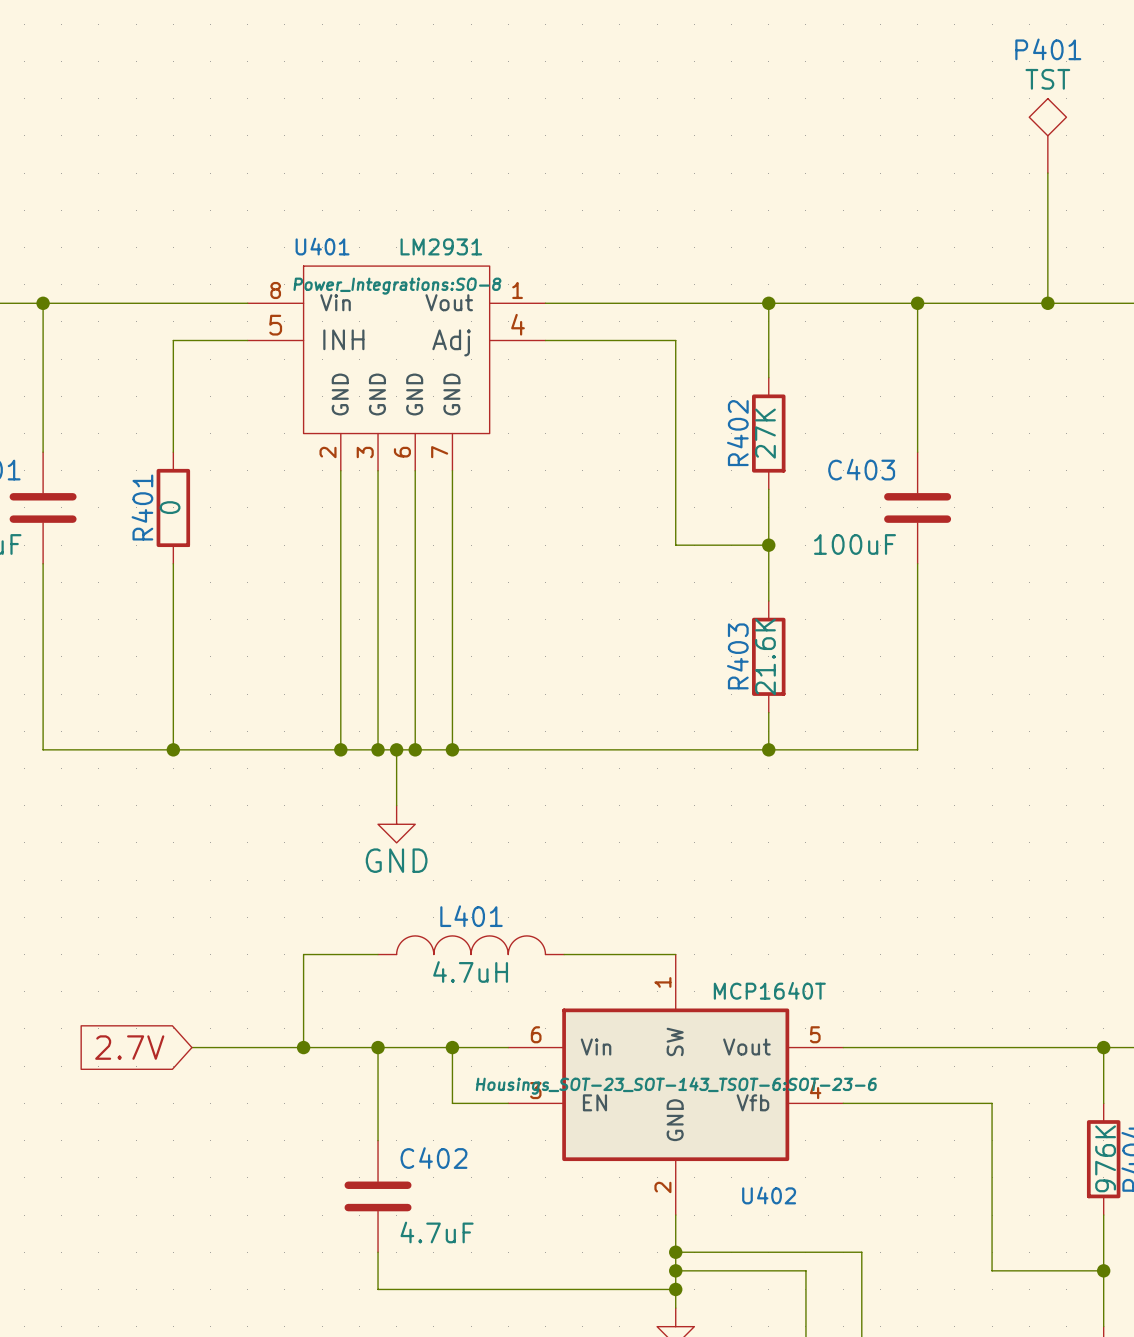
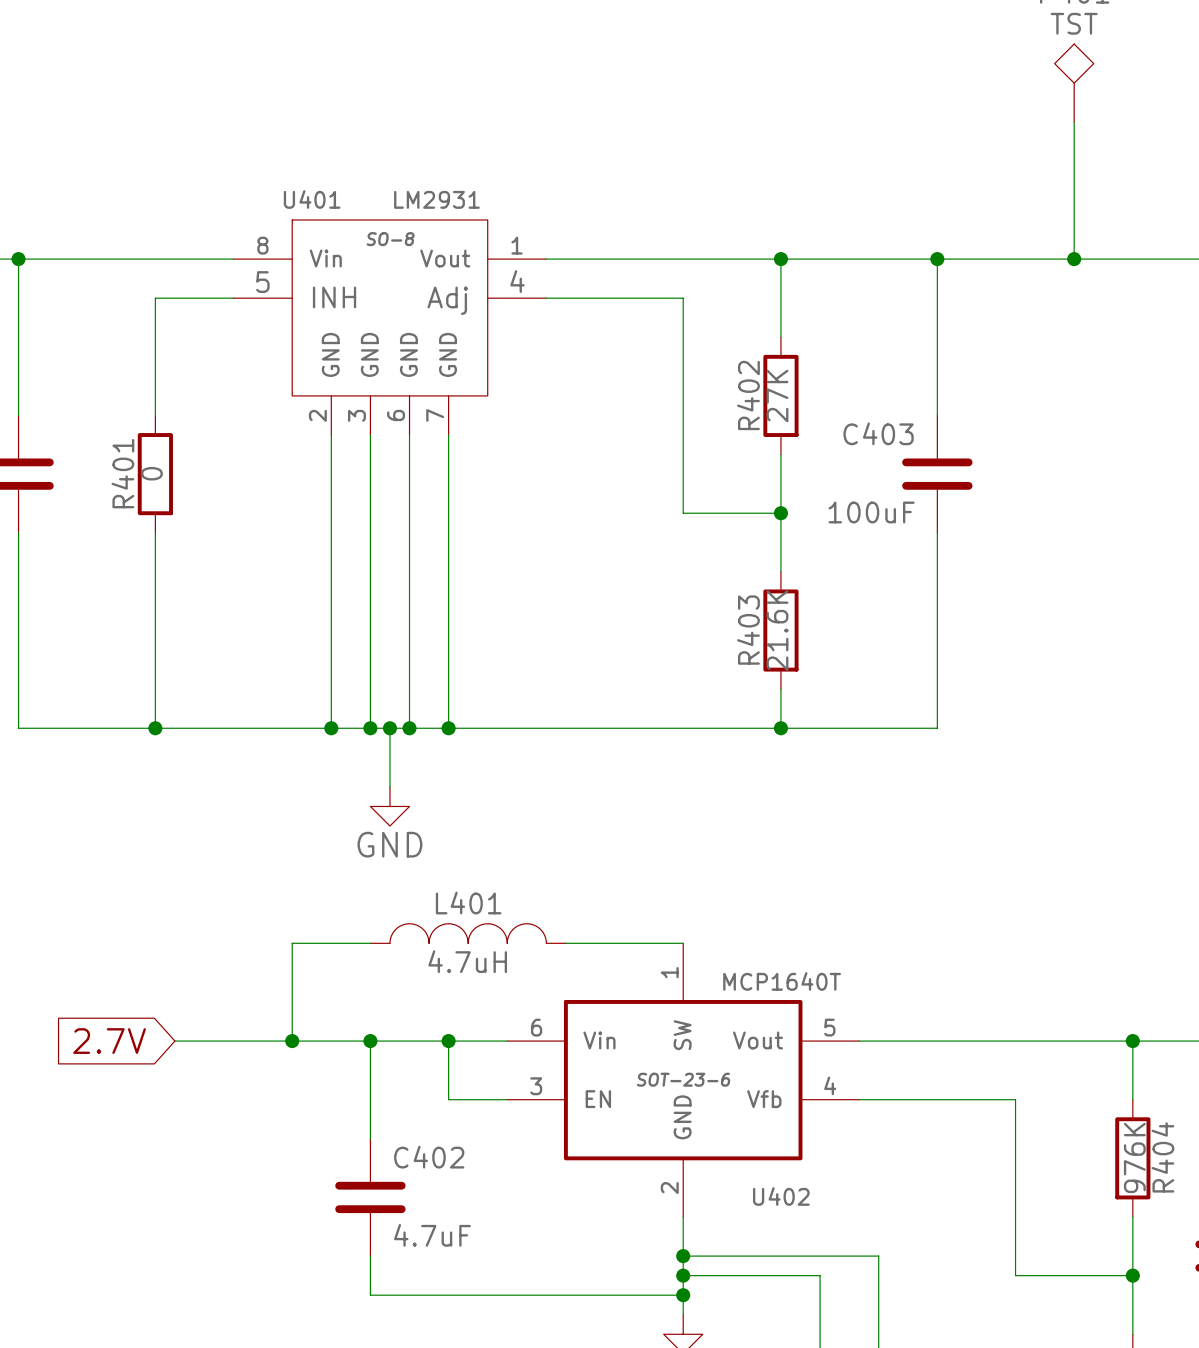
U401 text: Power_Integrations:SO-8 (397, 286) -> SO-8 (390, 239)
U402 text: Housings_SOT-23_SOT-143_TSOT-6:SOT-23-6 (676, 1085) -> SOT-23-6 (683, 1079)

